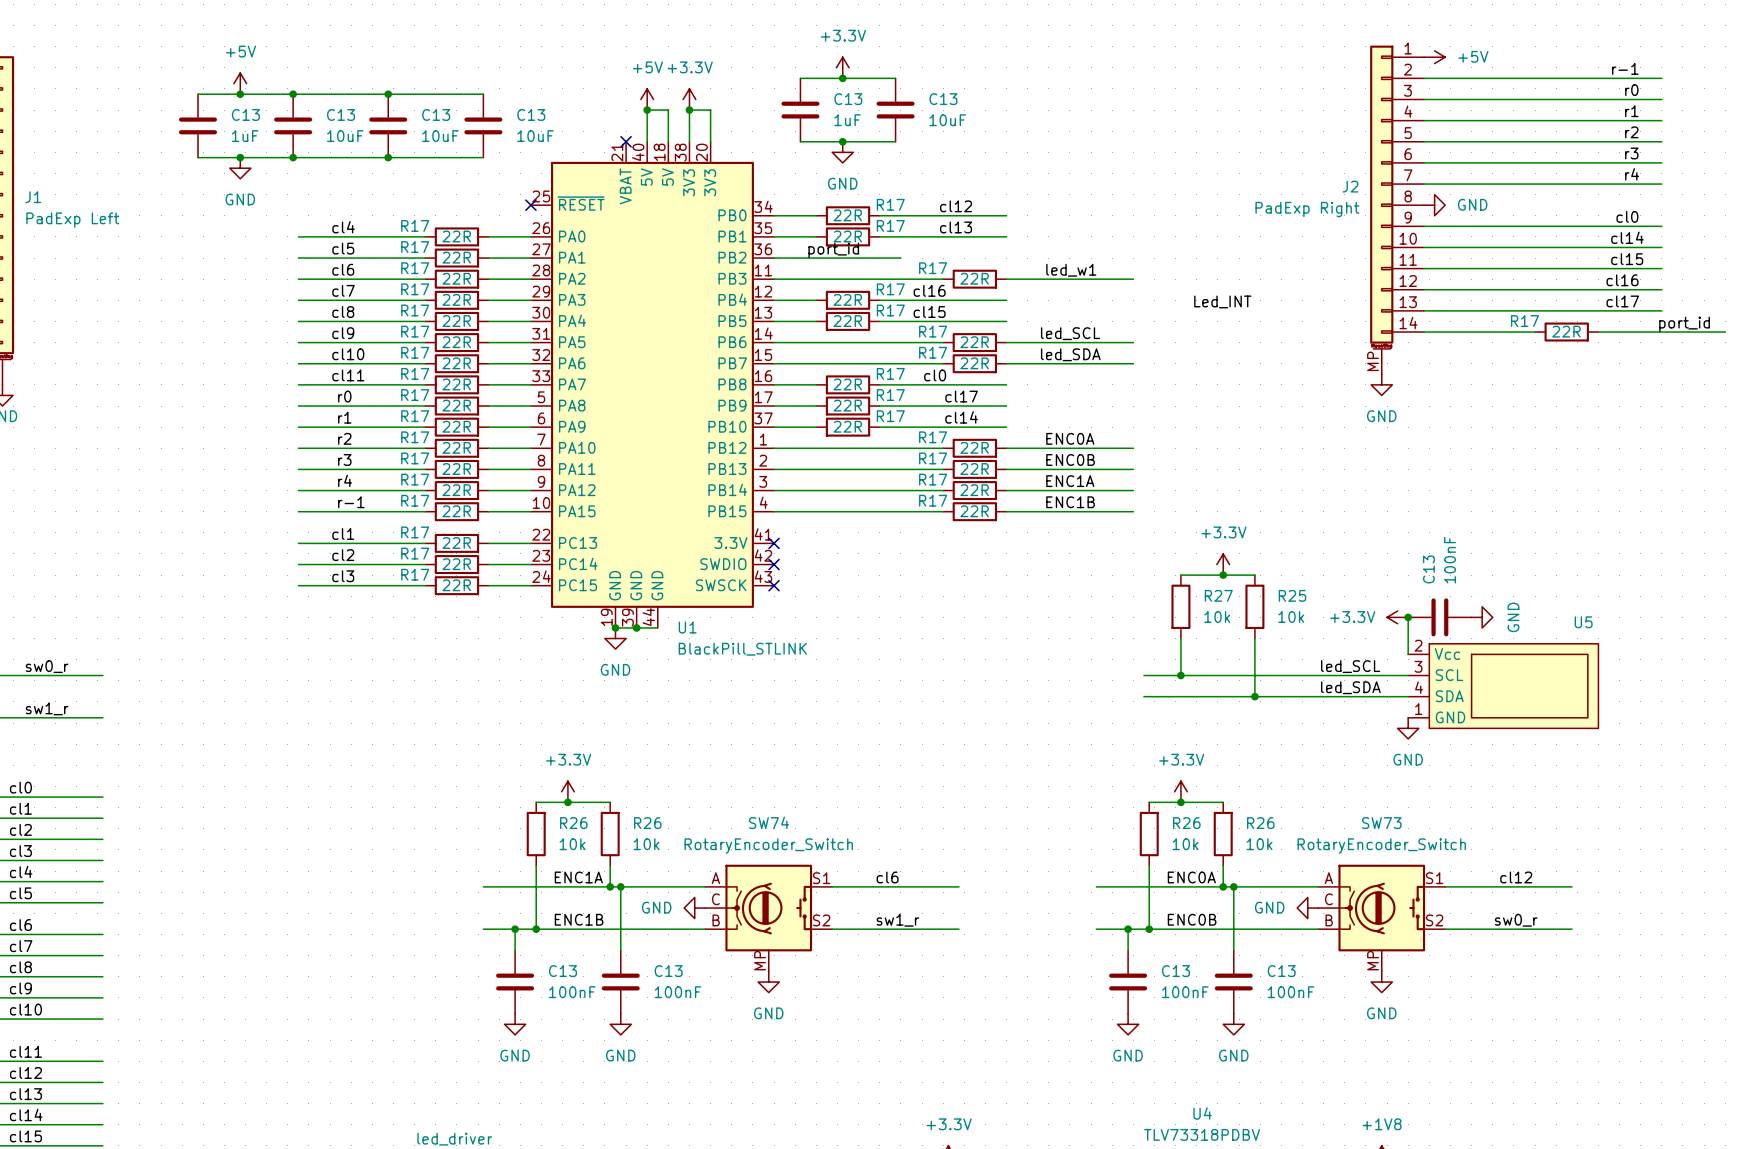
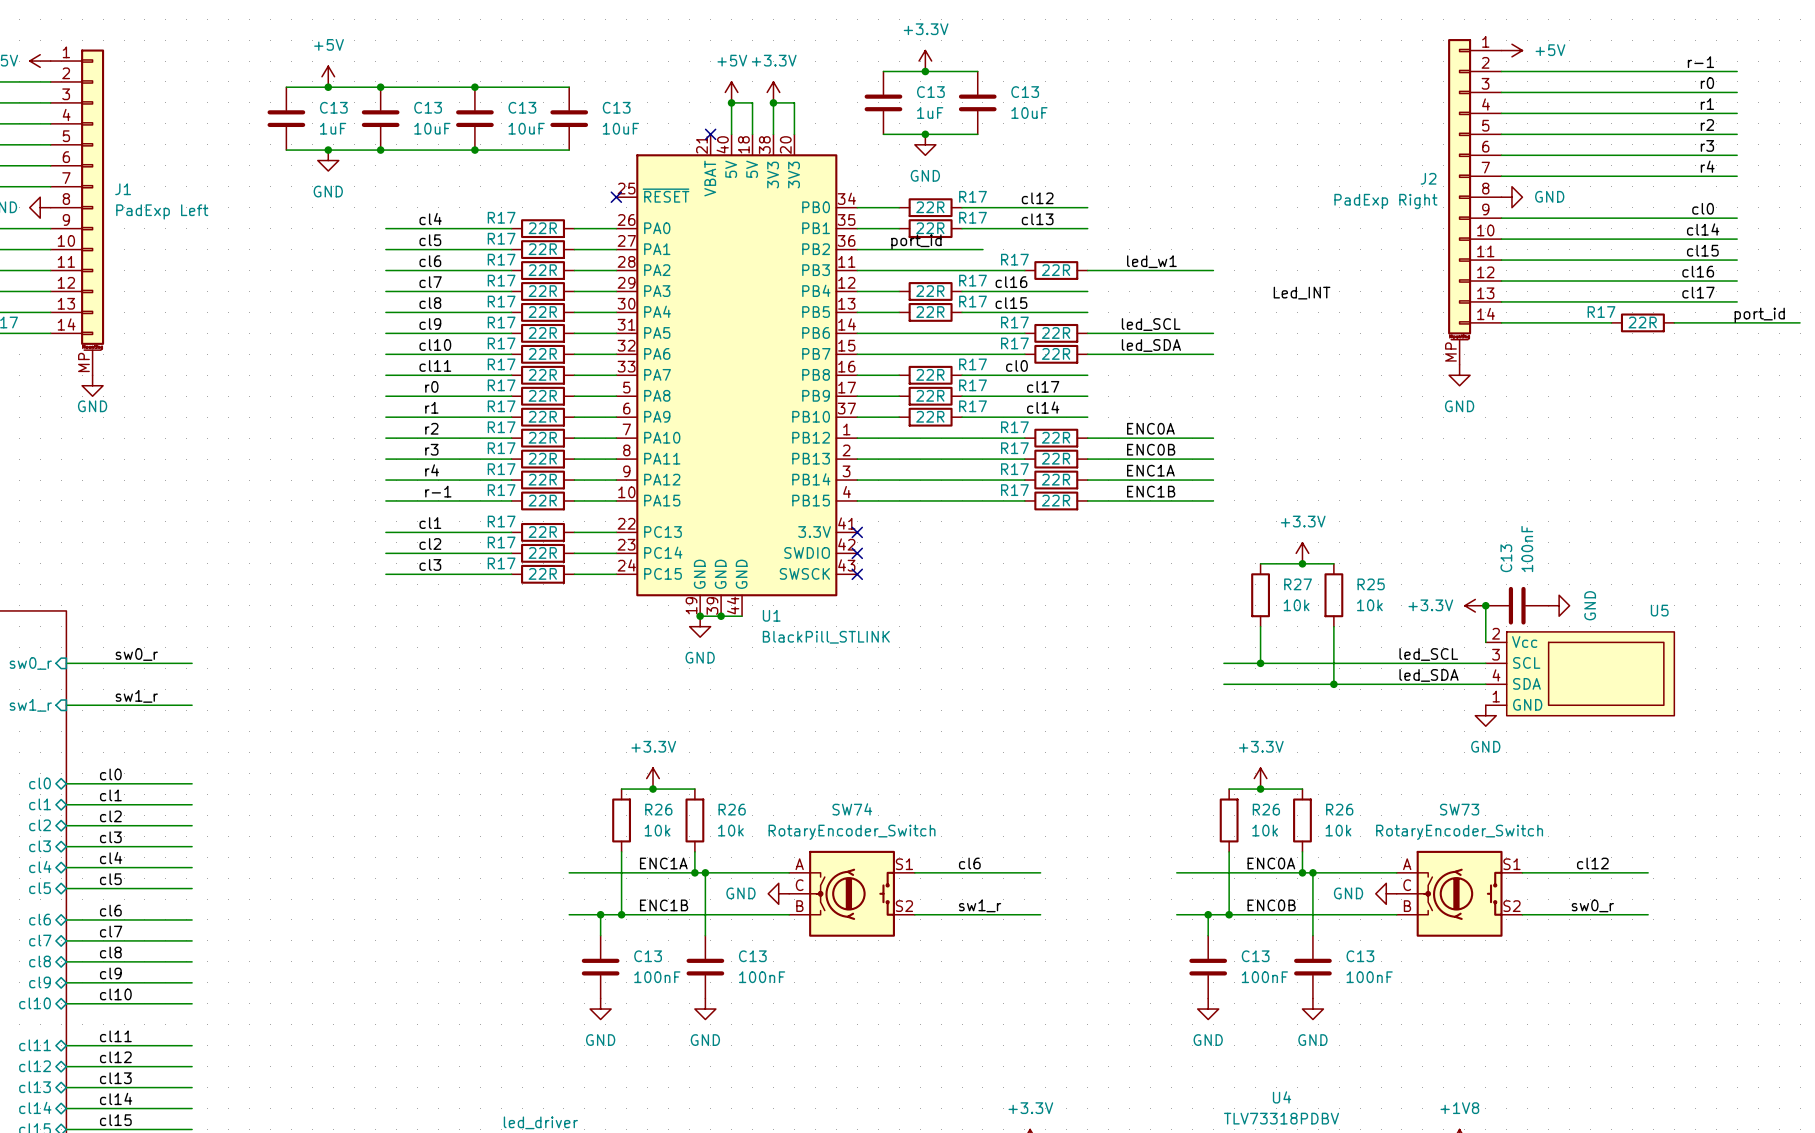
SW74 symbol: [705, 864, 833, 972] -> [789, 850, 915, 937]
SW73 symbol: [1318, 864, 1446, 972] -> [1396, 850, 1523, 937]
power symbol: GND (768, 982) -> none
power symbol: GND (1381, 982) -> none

